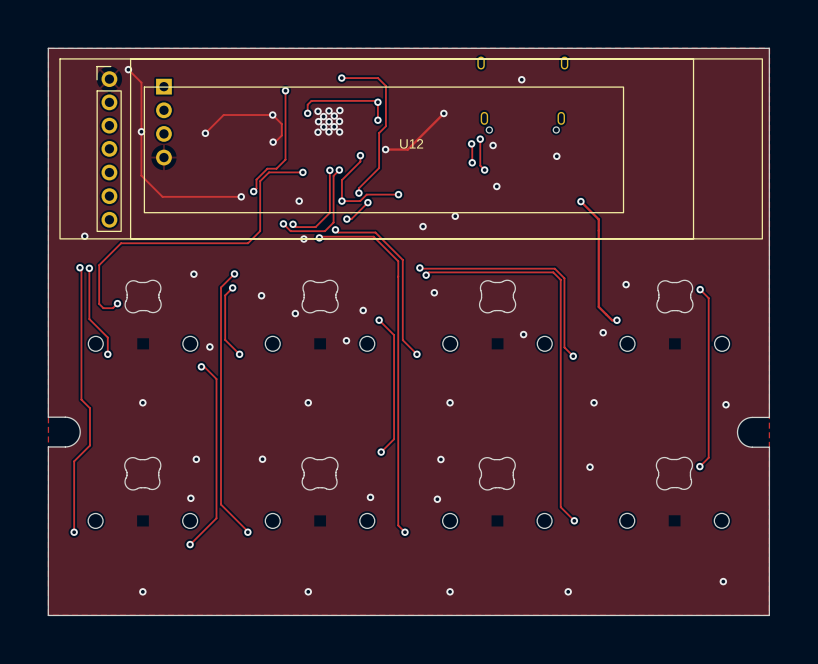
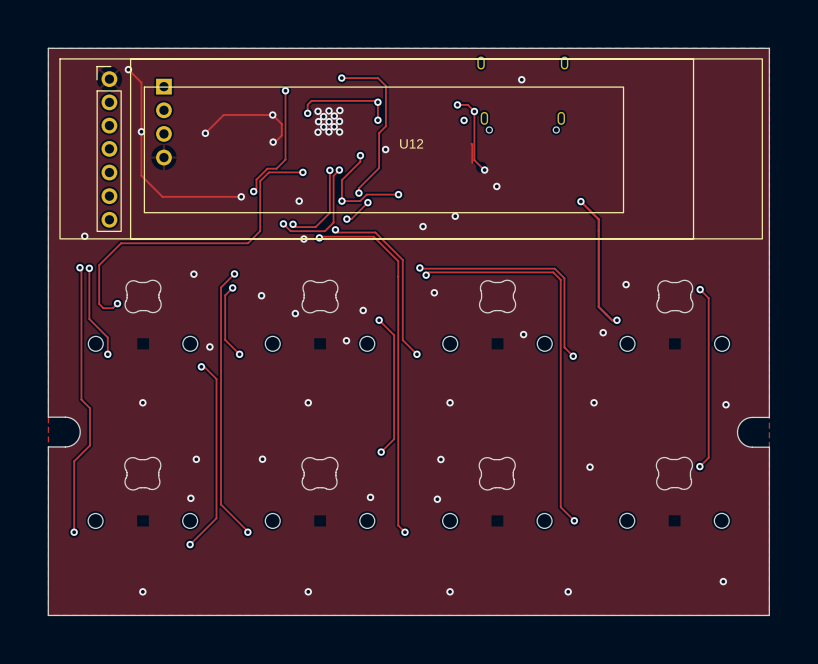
track: none -> (457, 104) (467, 104) (474, 111) (474, 160) (481, 167)
via: none -> (457, 104)
via: none -> (474, 111)
track: (443, 113) (407, 149) (385, 149) -> none
via: (443, 113) -> none
via: none -> (464, 120)
track: (480, 139) (480, 165) (484, 170) -> none
via: (480, 139) -> none
via: (471, 143) -> none
via: (493, 145) -> none
via: (556, 156) -> none
via: (472, 162) -> none

